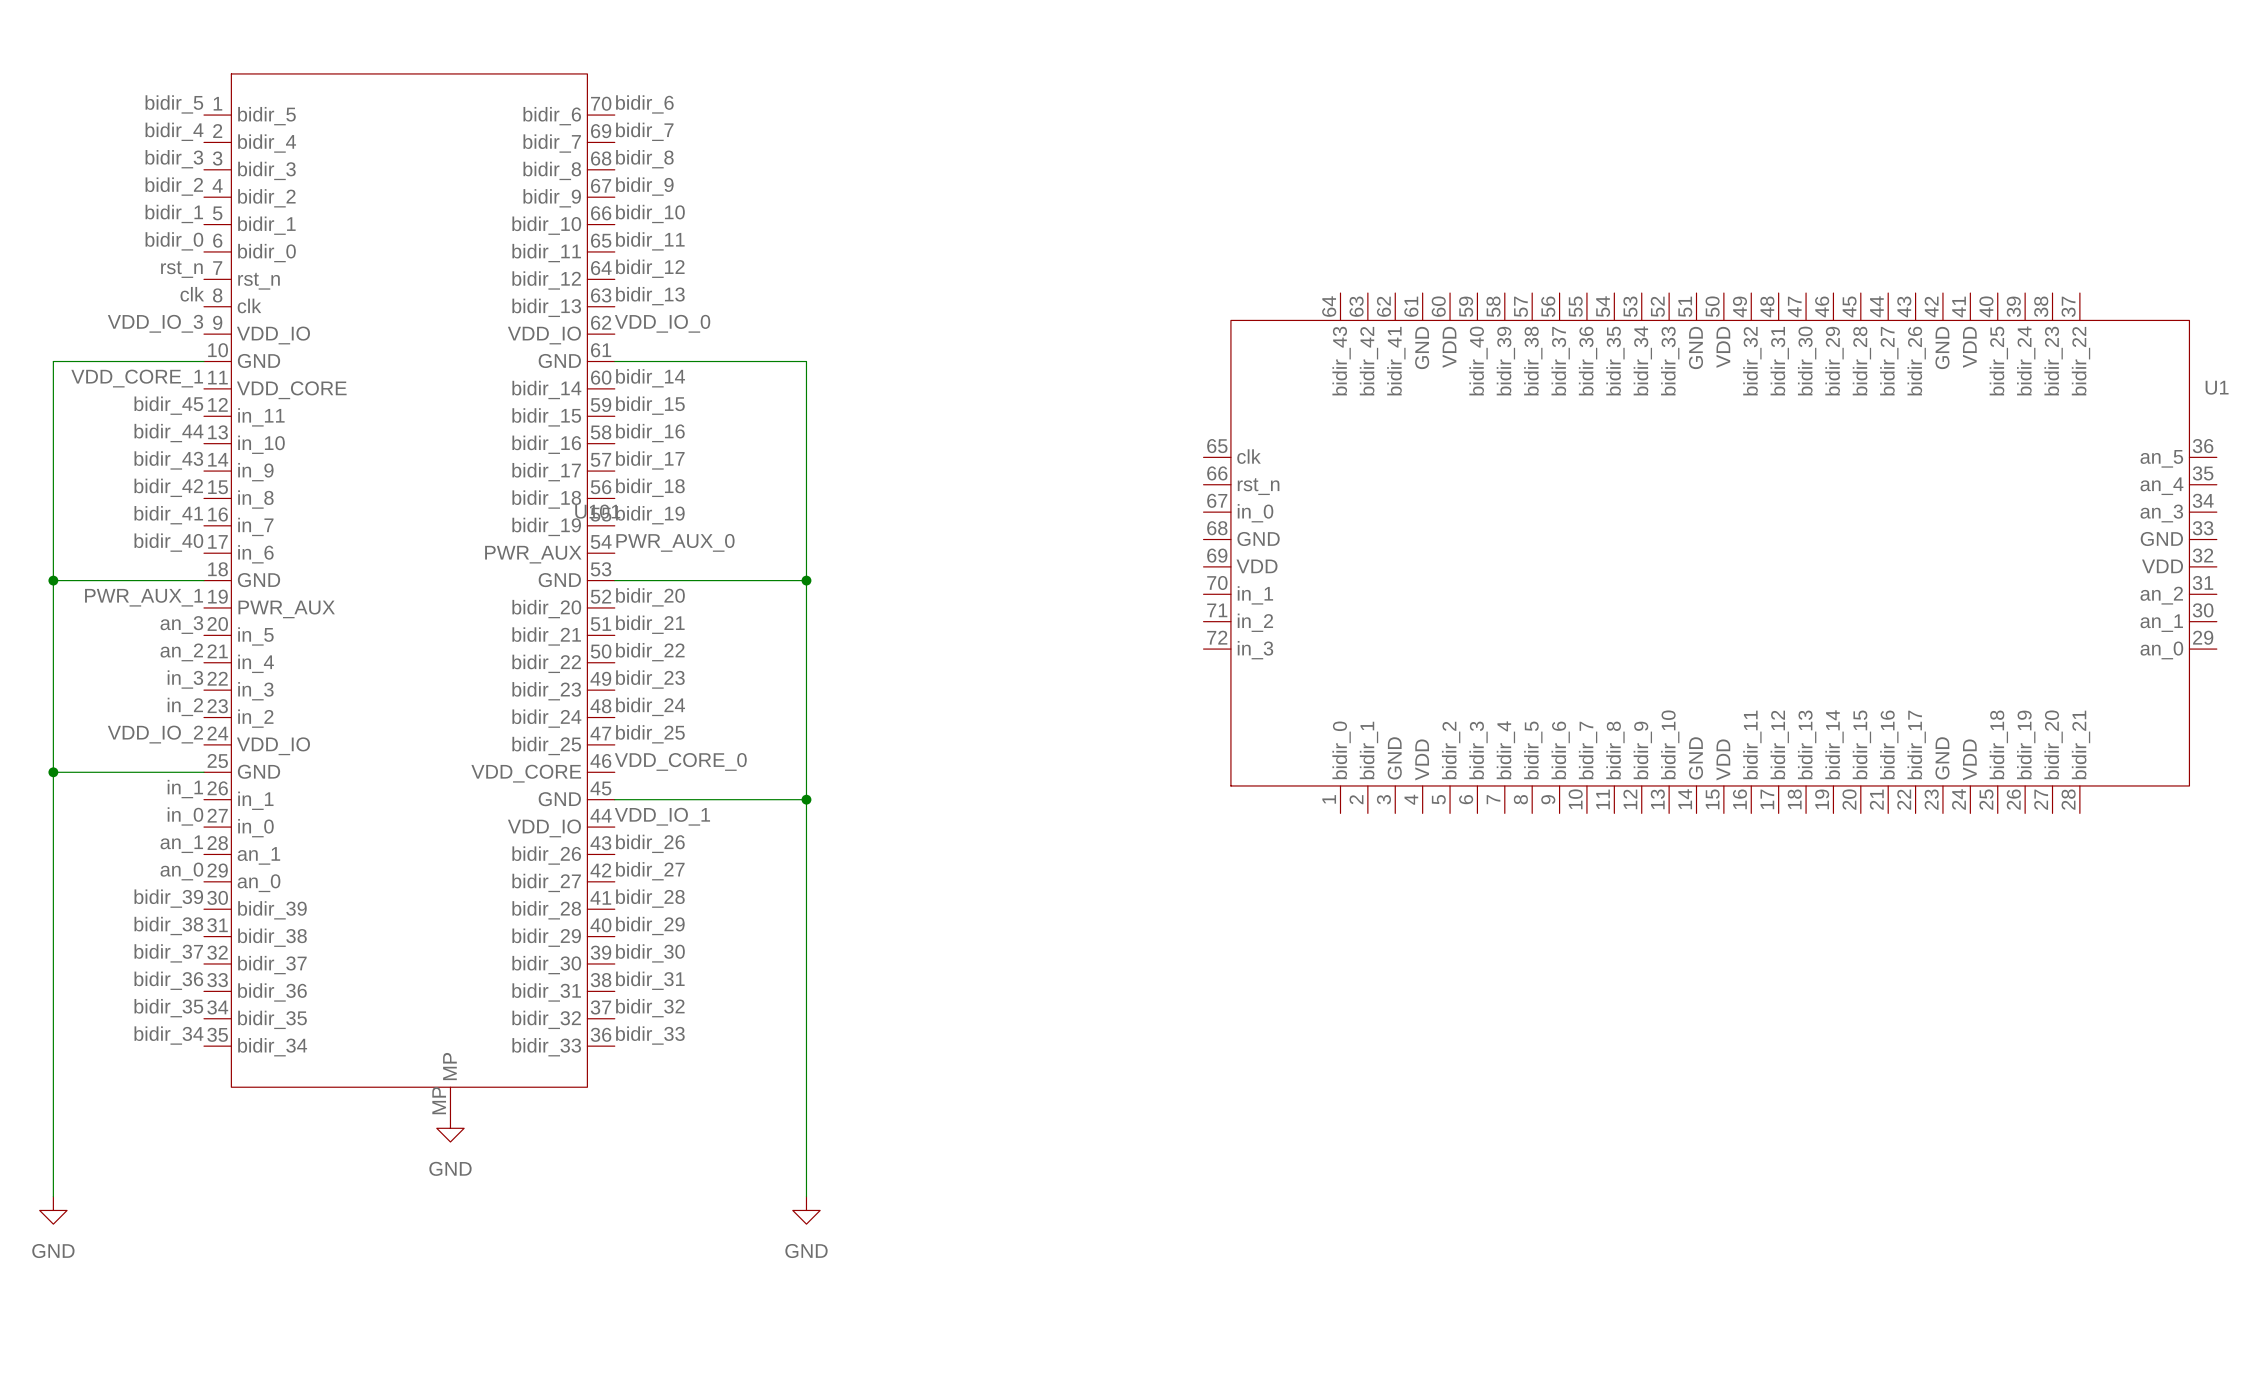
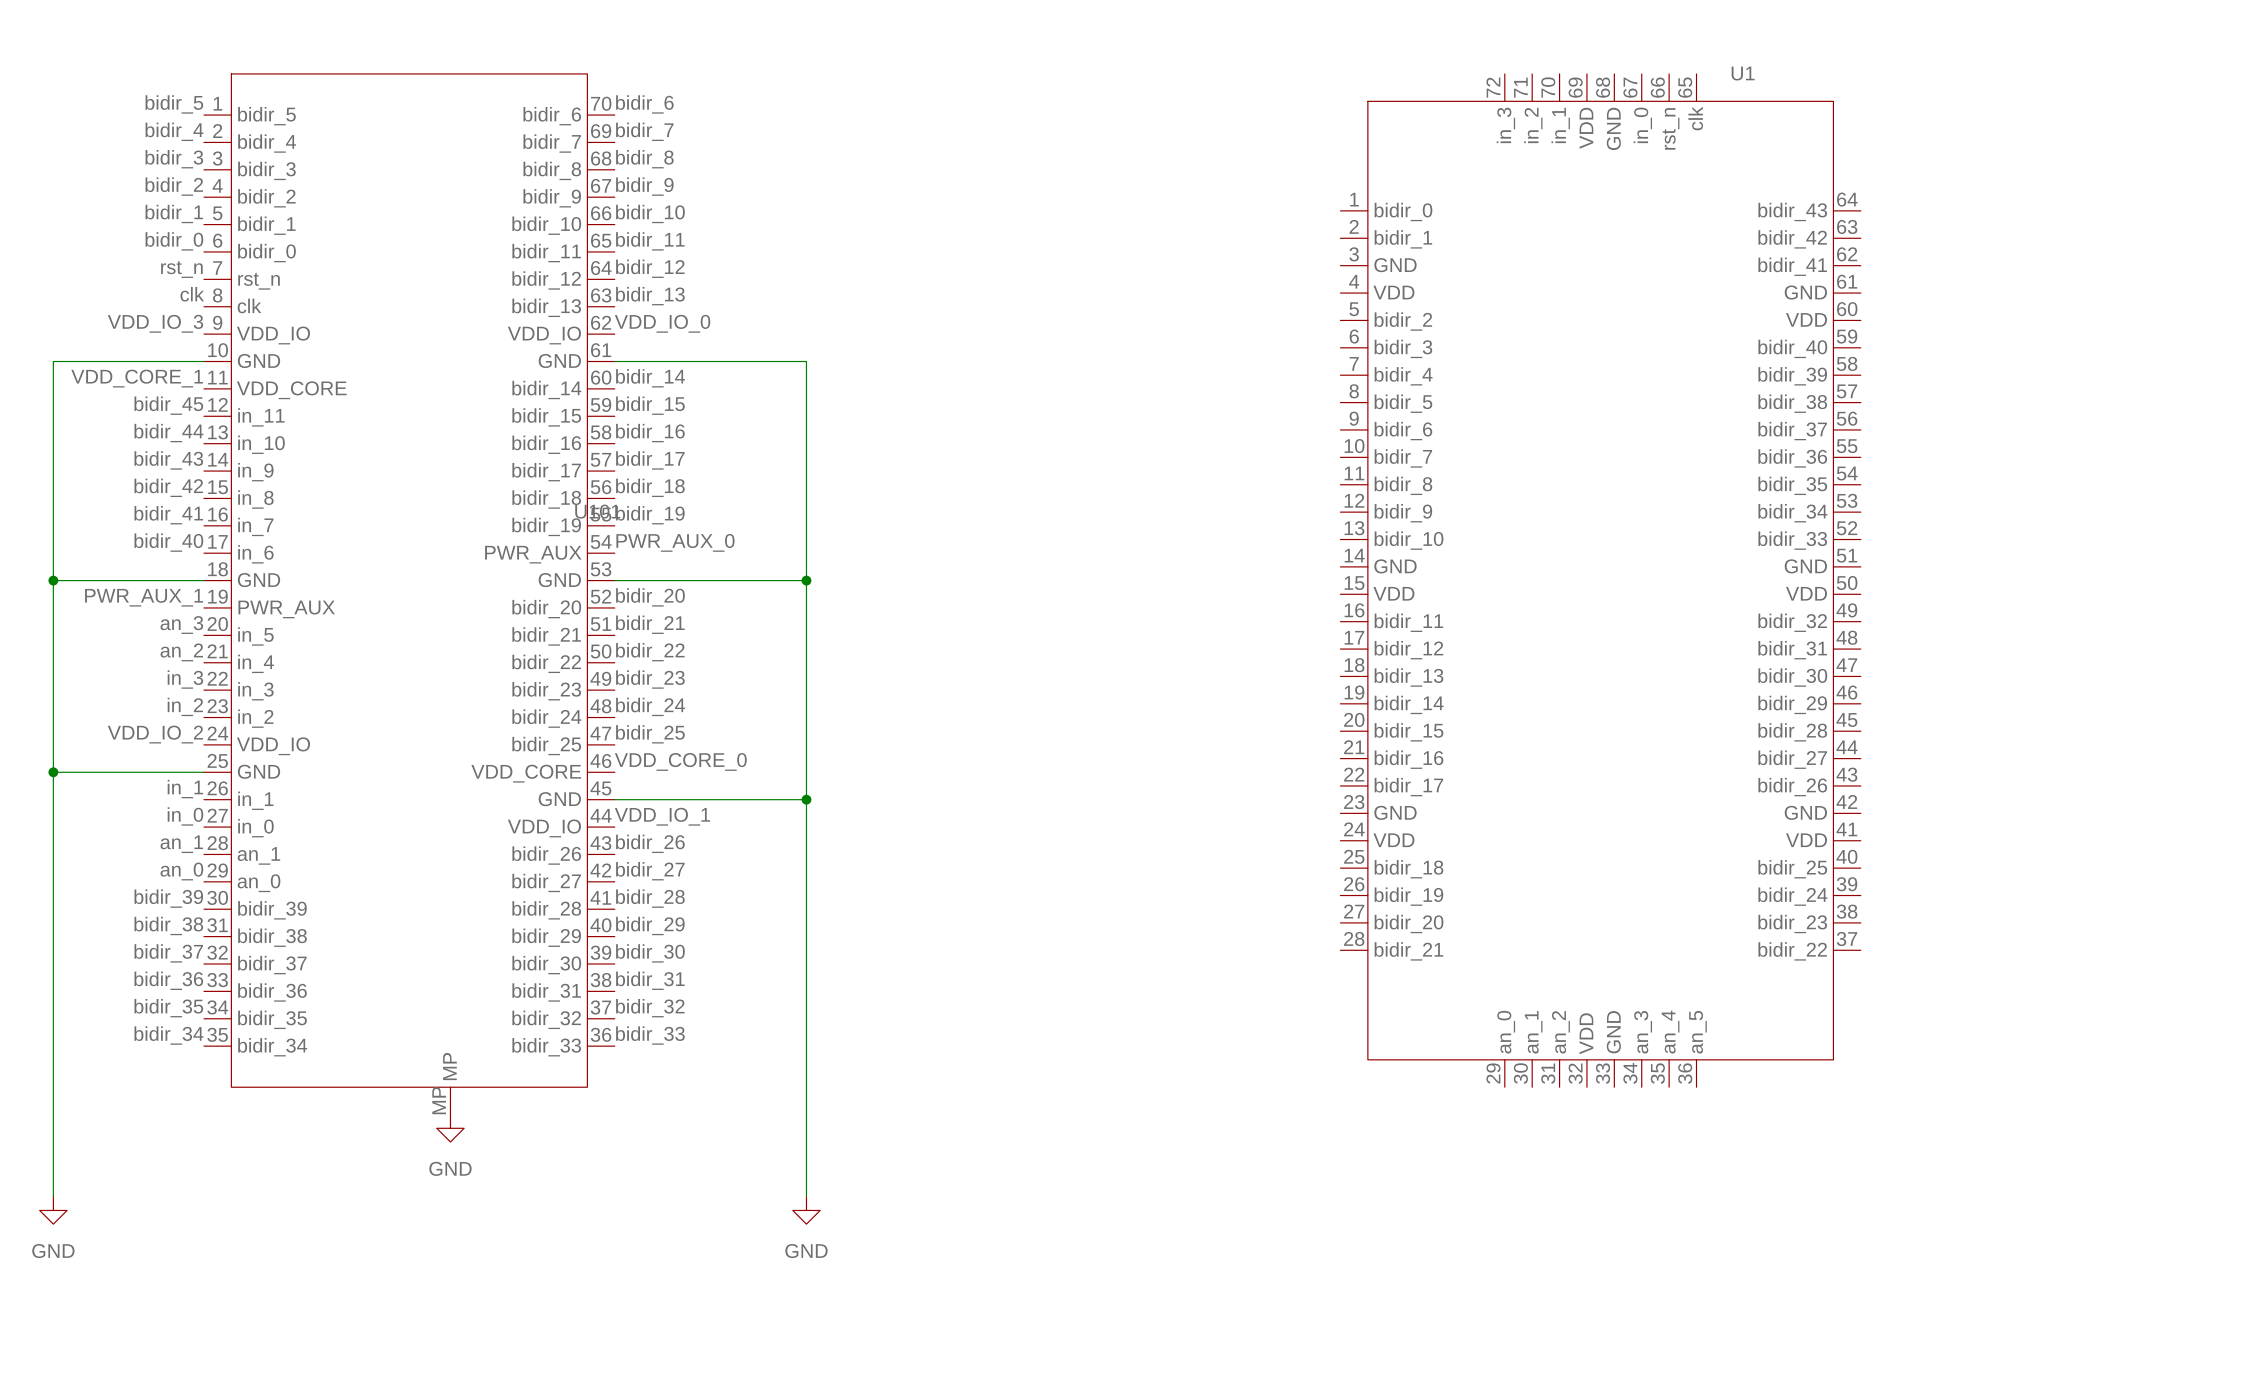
U1 name position: U1 (2217, 387) -> U1 (1743, 73)
U1 rotation: 0° (1710, 553) -> 90° clockwise (1600, 580)

